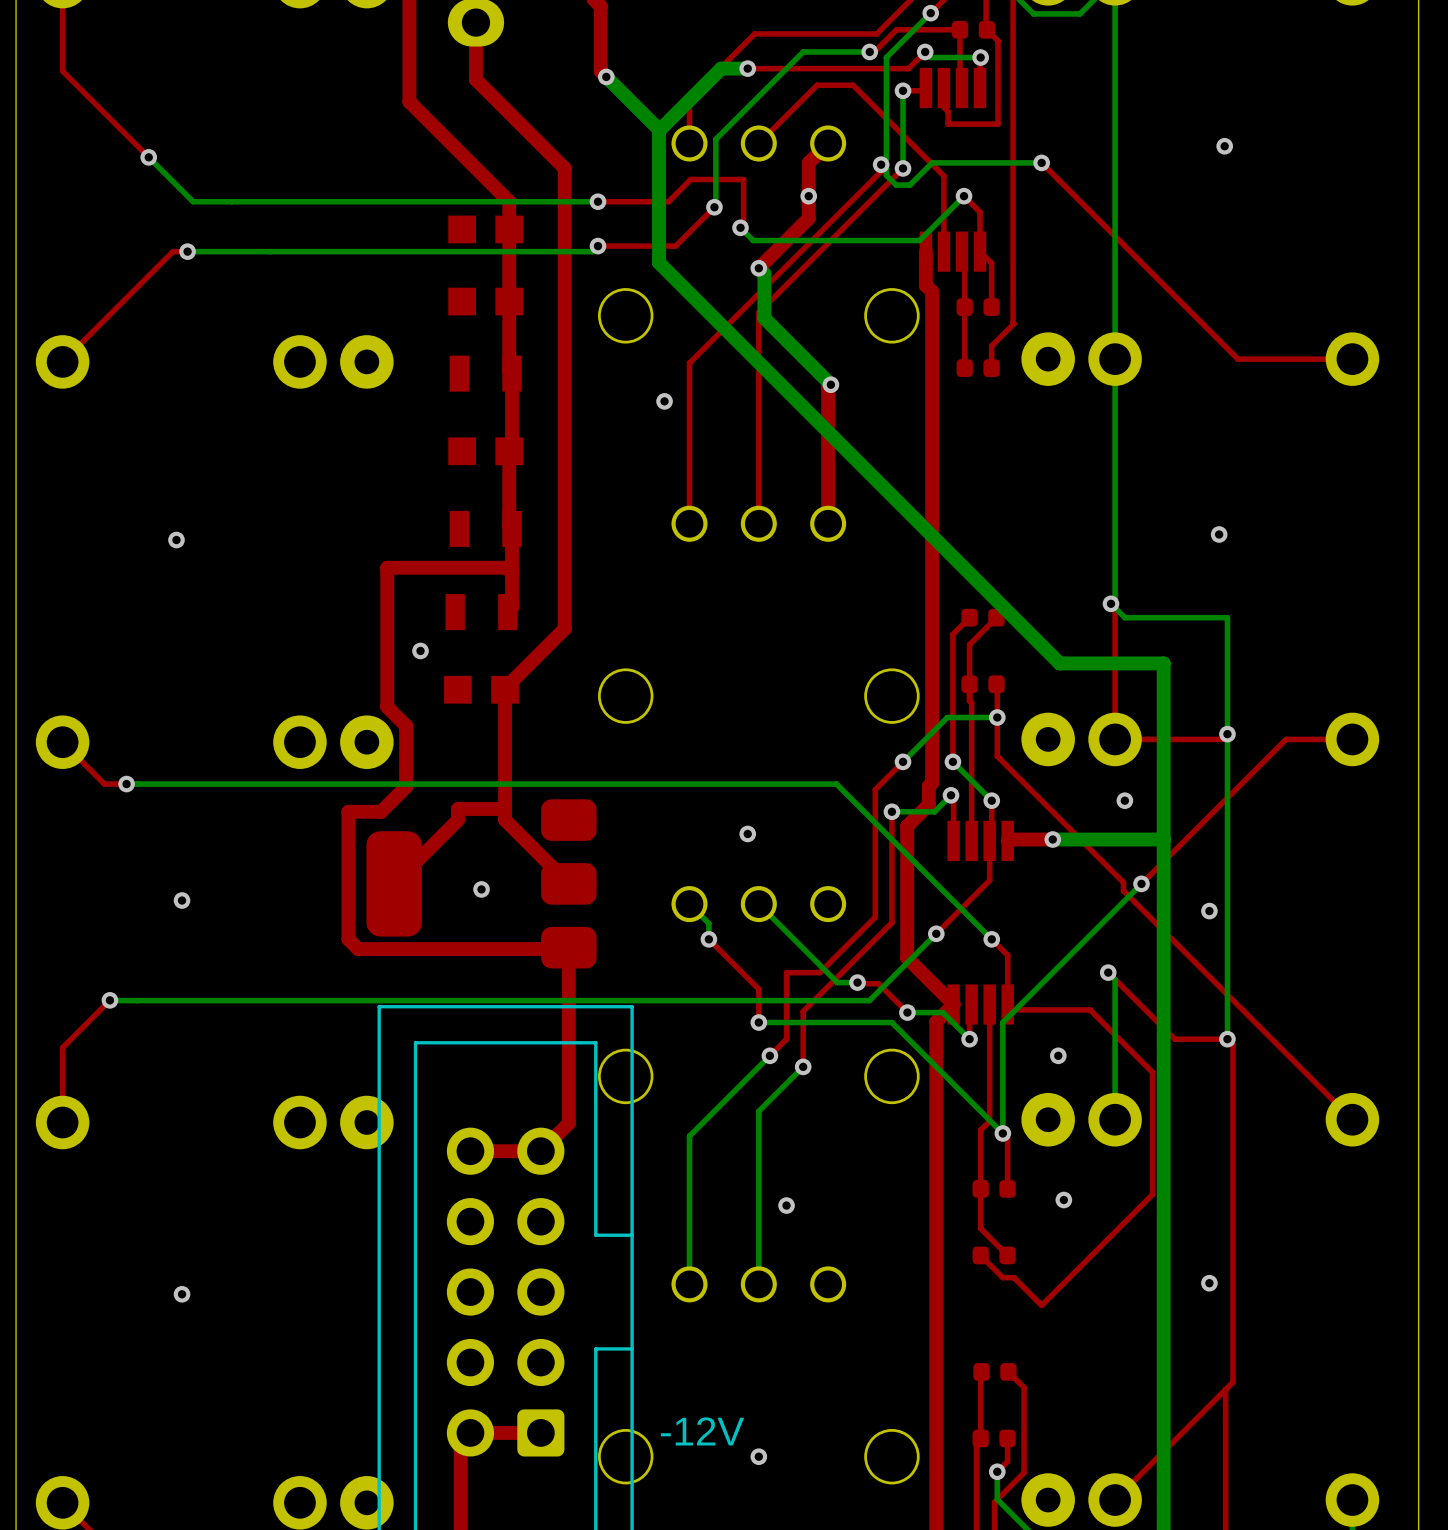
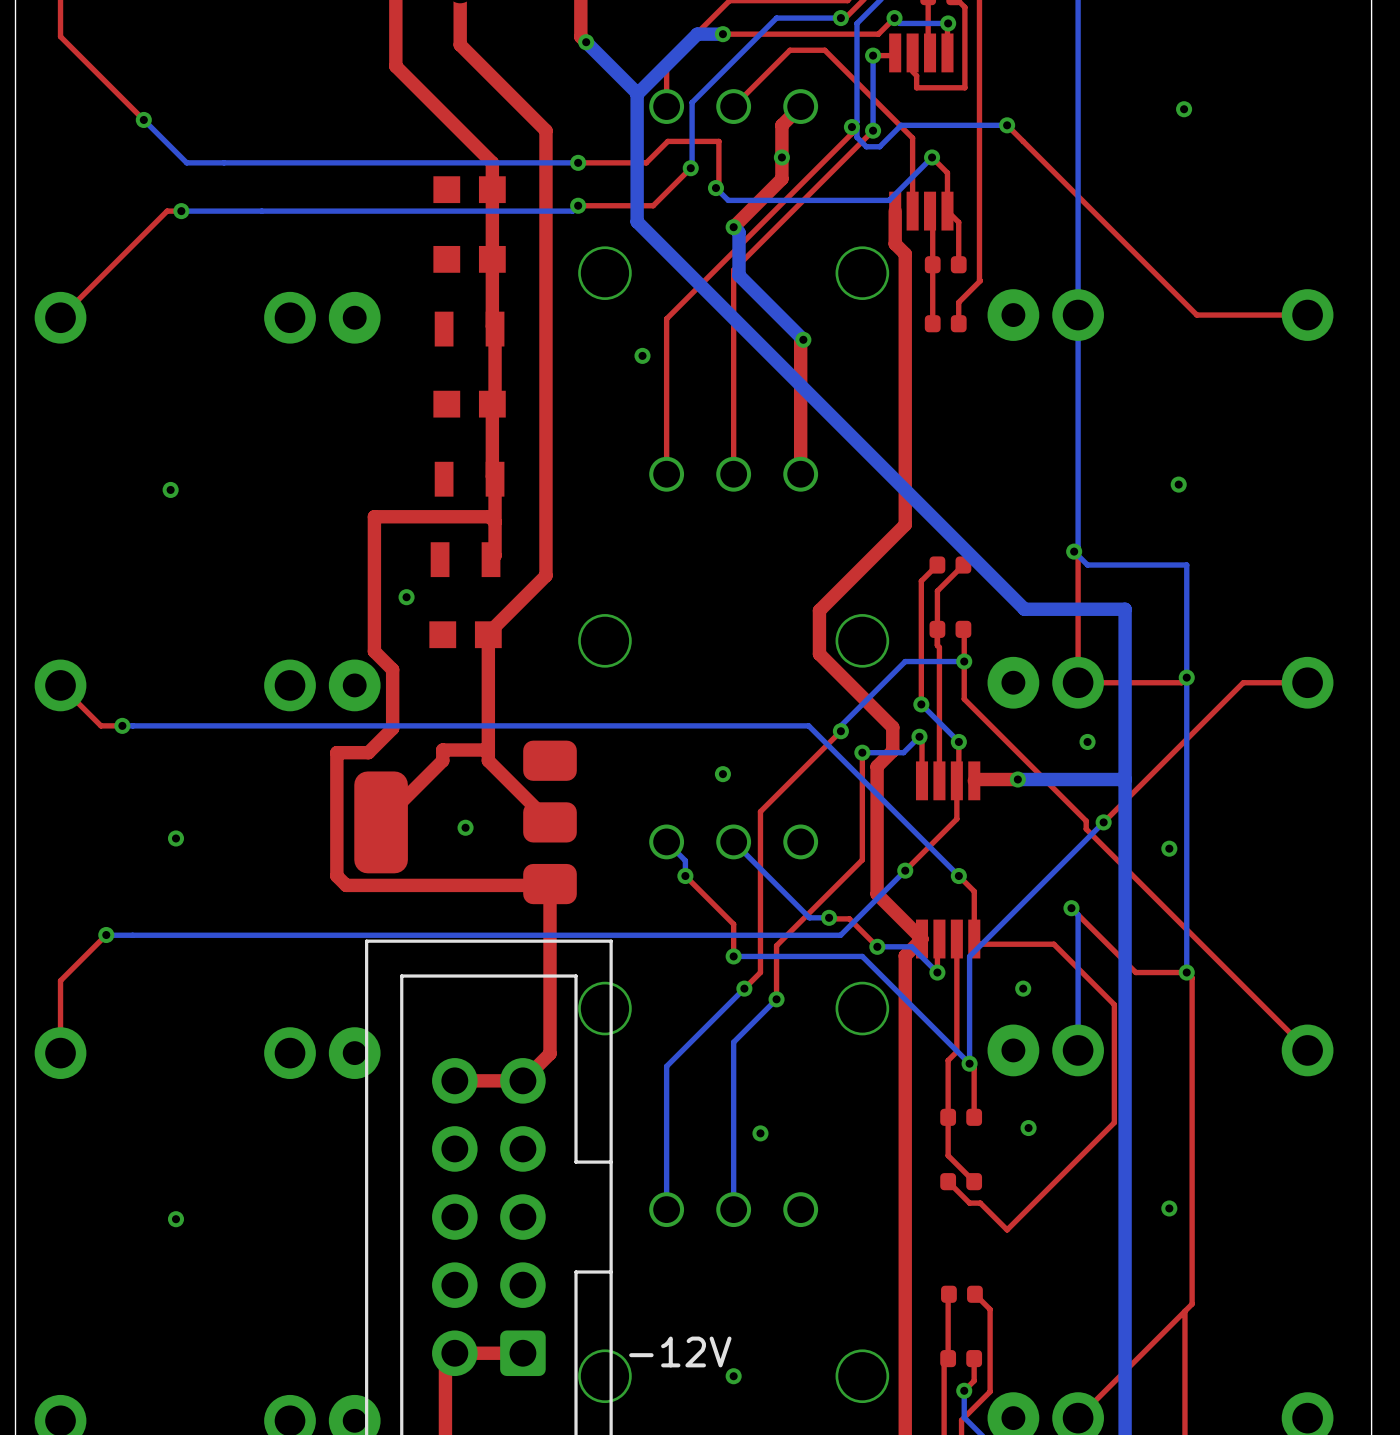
top track: (932, 291) (932, 782) (928, 786) (928, 804) (923, 809) -> (901, 249) (905, 254) (905, 524) (819, 610) (819, 654) (892, 727) (892, 750)
bottom track: (947, 717) (903, 761) -> (915, 661) (905, 661) (840, 725) (840, 731)
top track: (903, 761) (875, 789) (875, 917) (819, 972) (786, 972) -> (840, 731) (760, 811) (760, 908)
via position: (903, 761) -> (840, 731)

